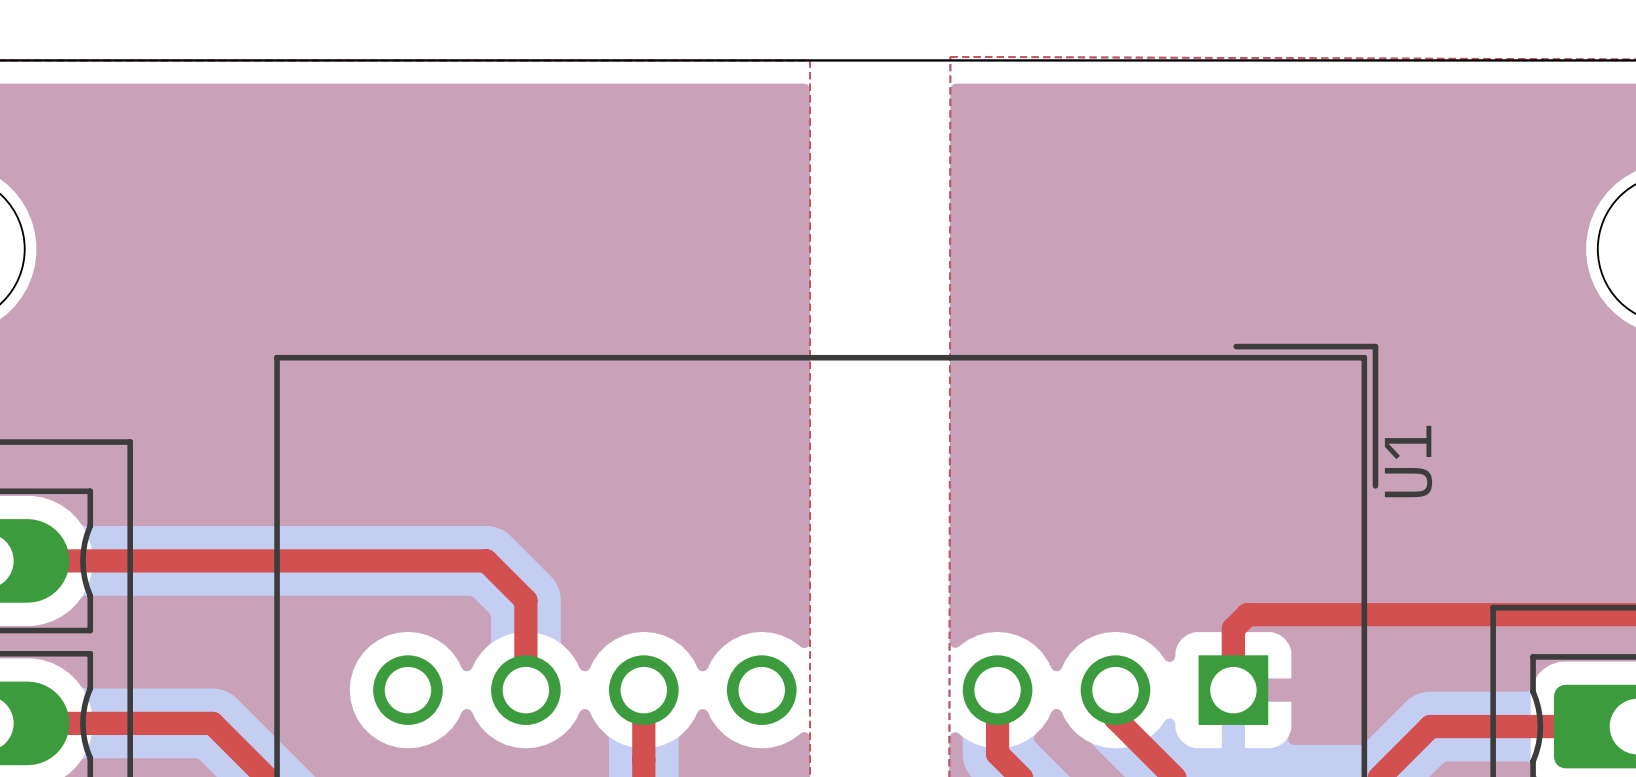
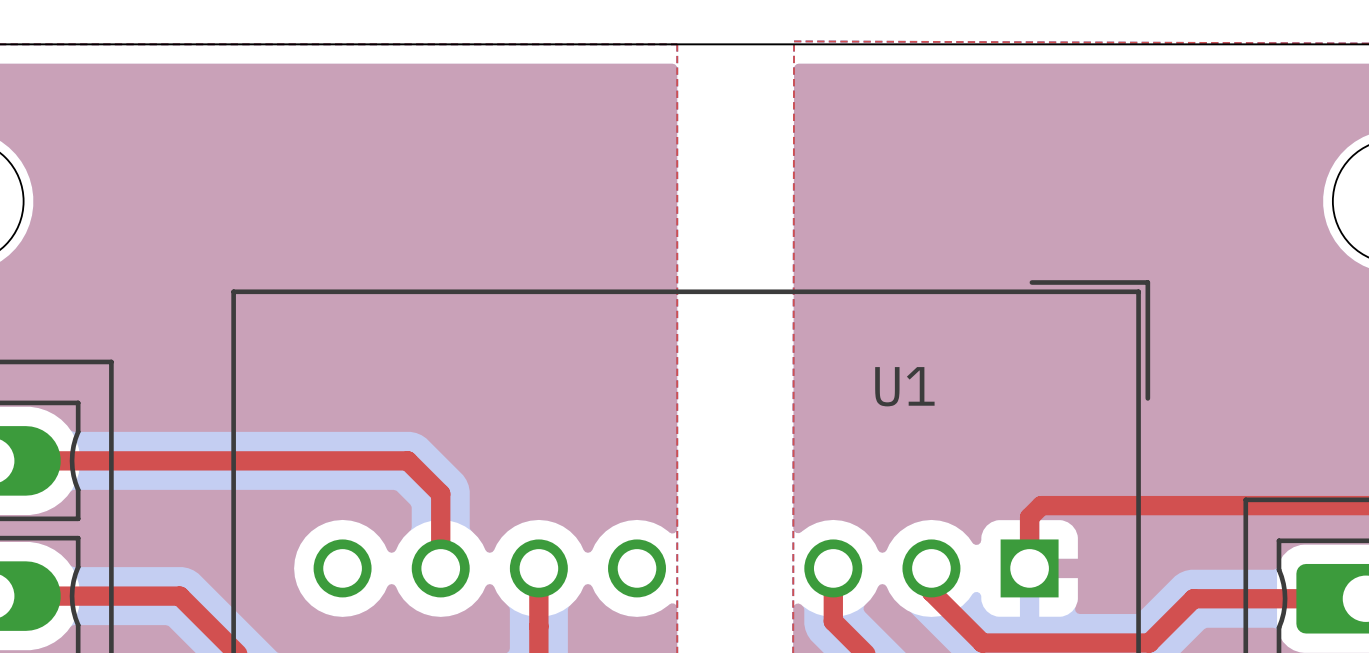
U1 name rotation: 0° (1408, 461) -> 90° clockwise (904, 386)
U1 name position: U1 (1408, 461) -> U1 (904, 386)

